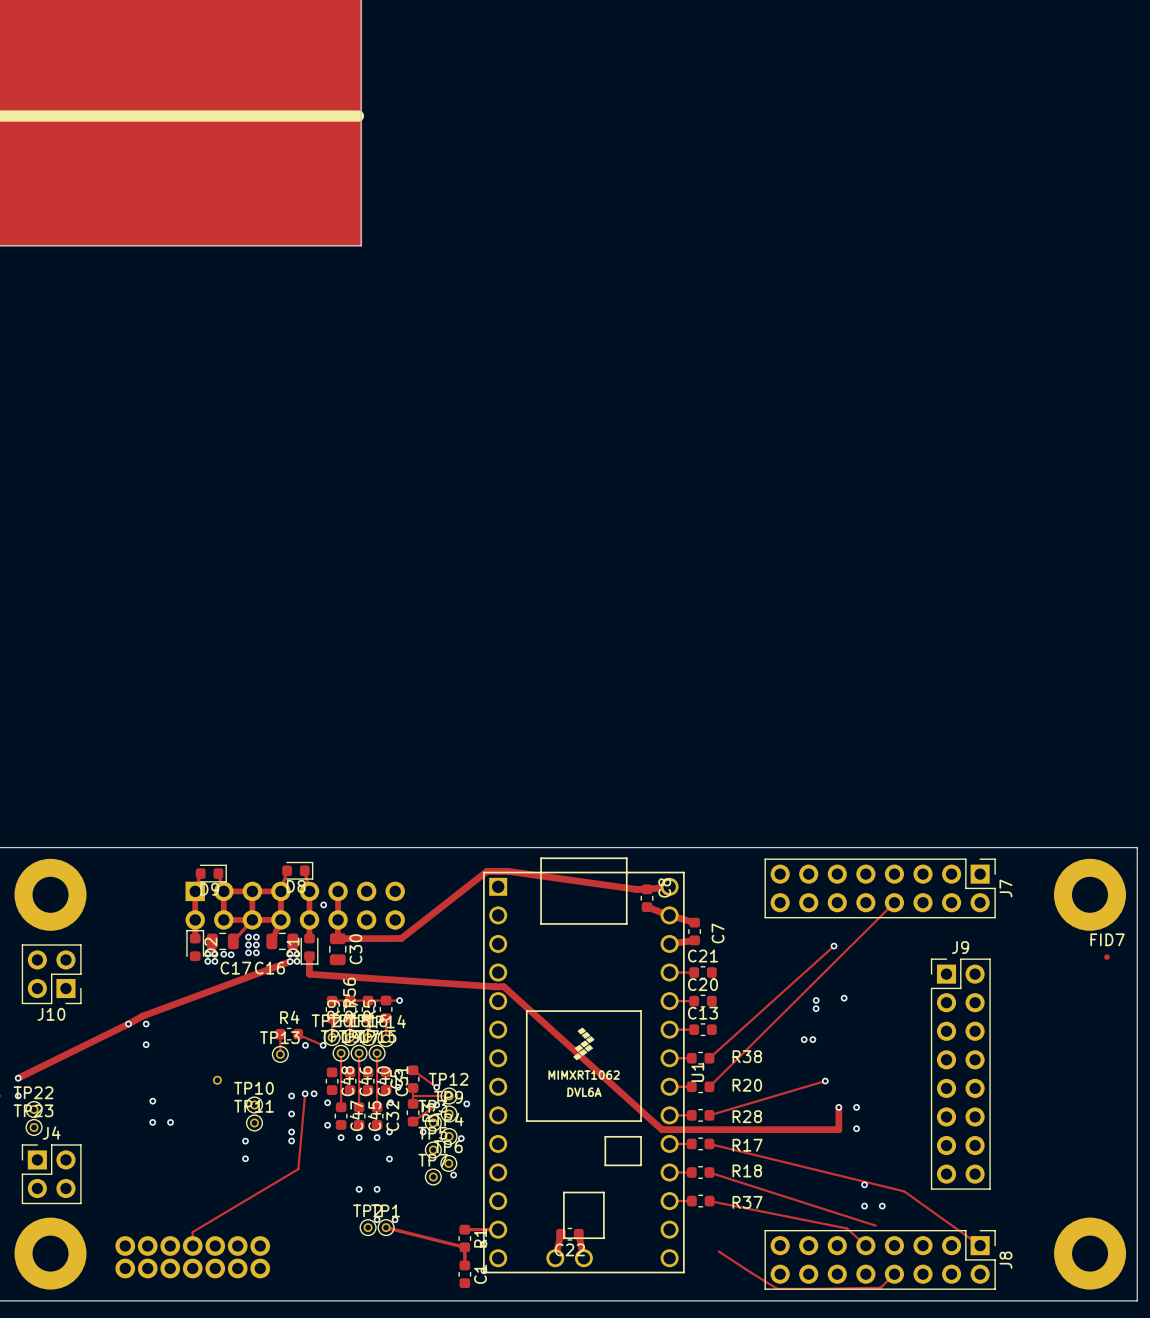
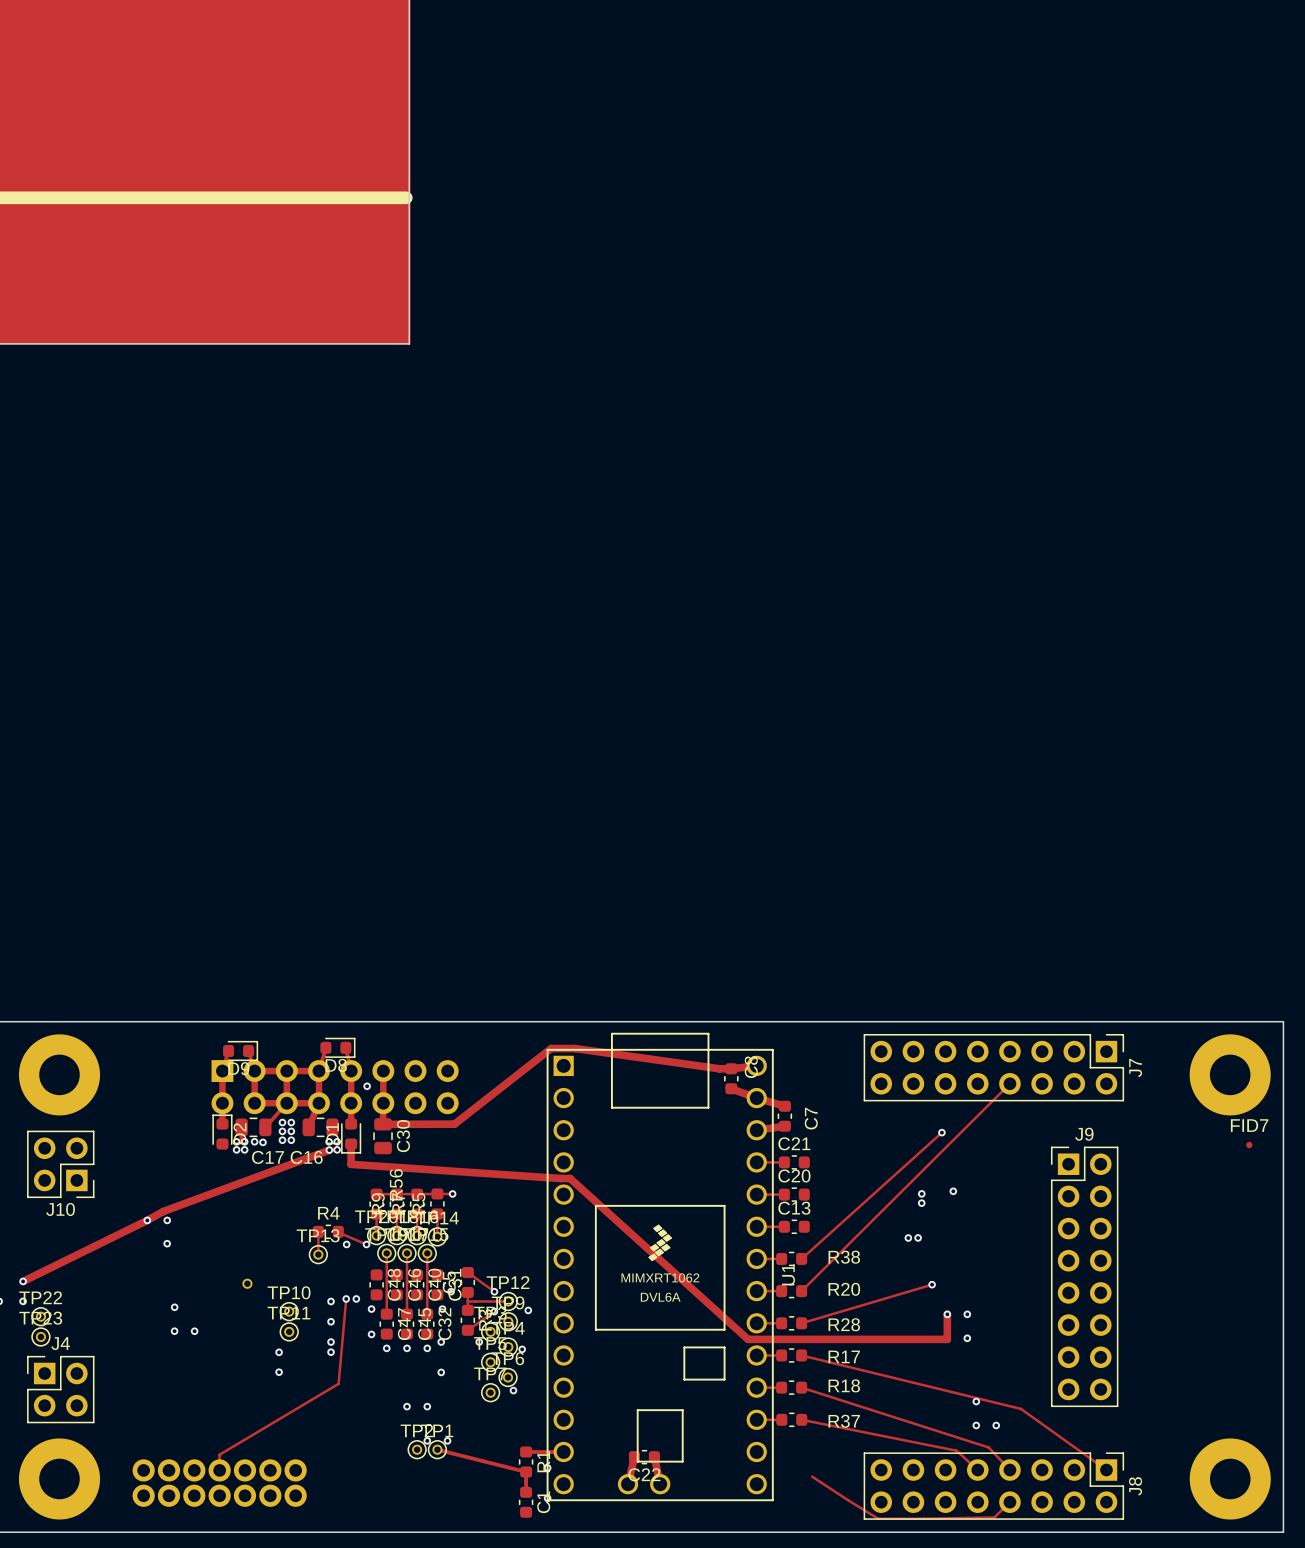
track: none -> (988, 1447) (1009, 1470)

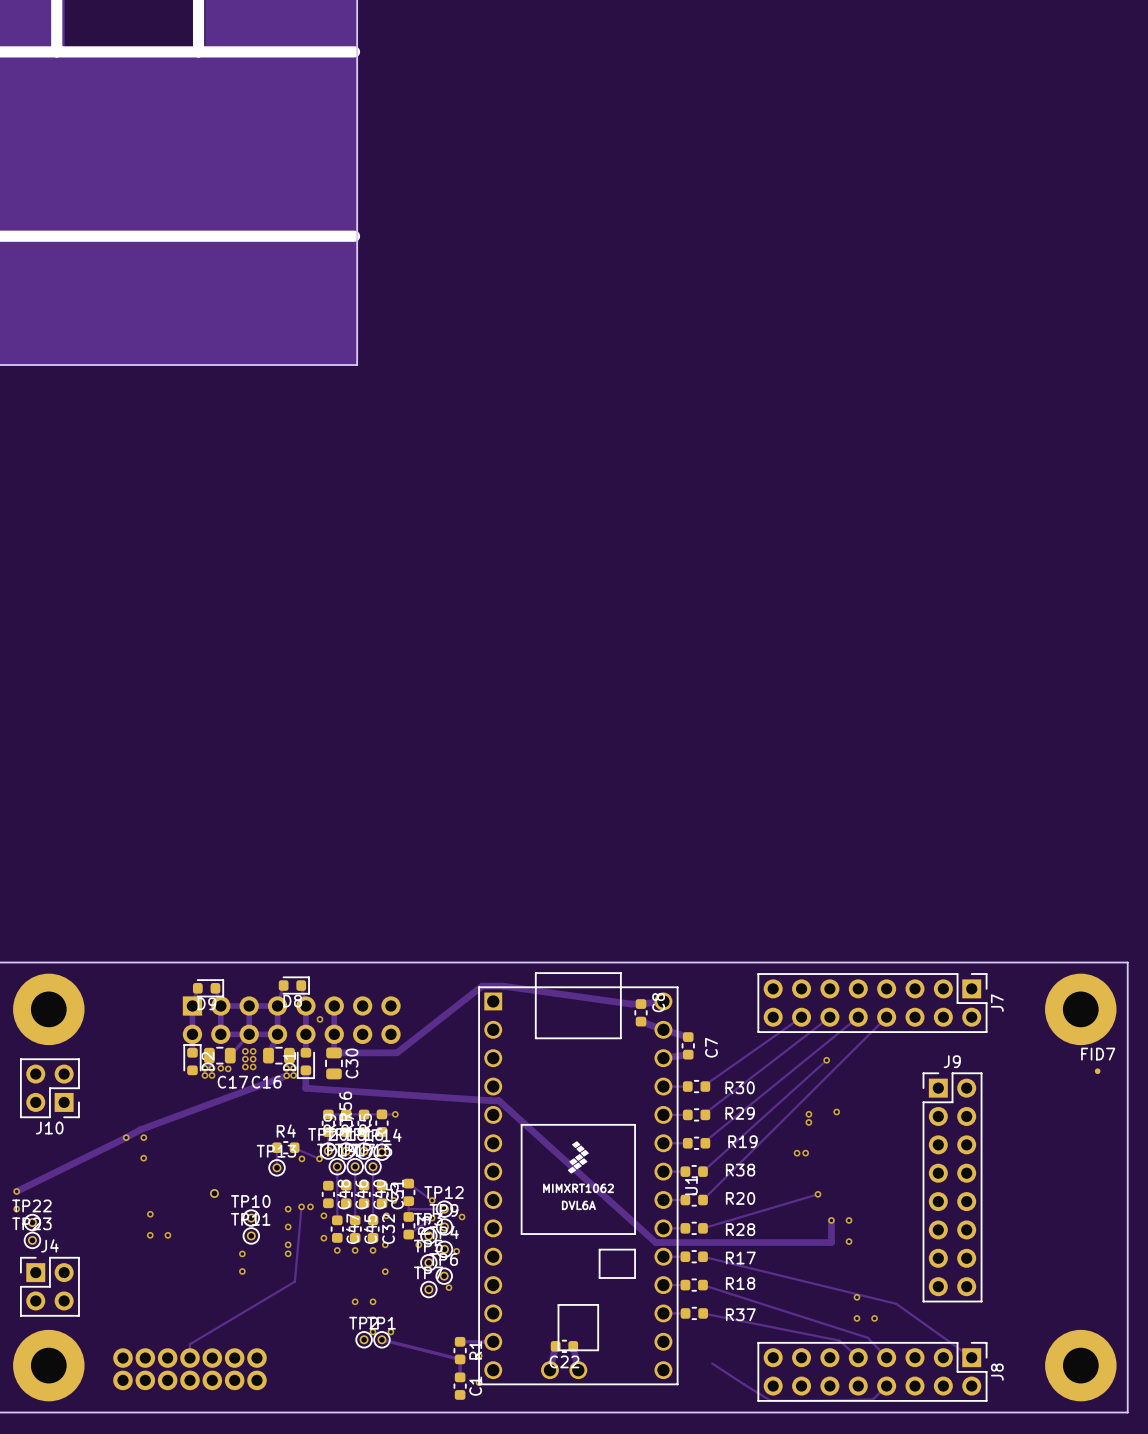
track: none -> (801, 1017) (702, 1086)
track: none -> (829, 1017) (702, 1114)
track: none -> (858, 1017) (702, 1143)
C21 name: C21 (794, 1143) -> R30 (740, 1087)
C20 name: C20 (794, 1176) -> R29 (740, 1113)
C13 name: C13 (794, 1208) -> R19 (742, 1141)

